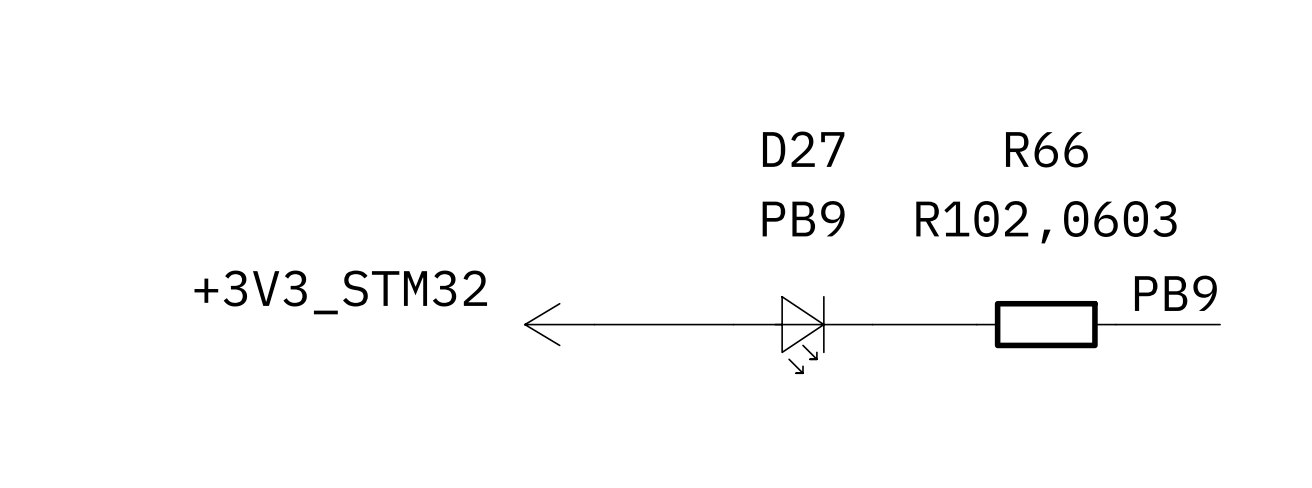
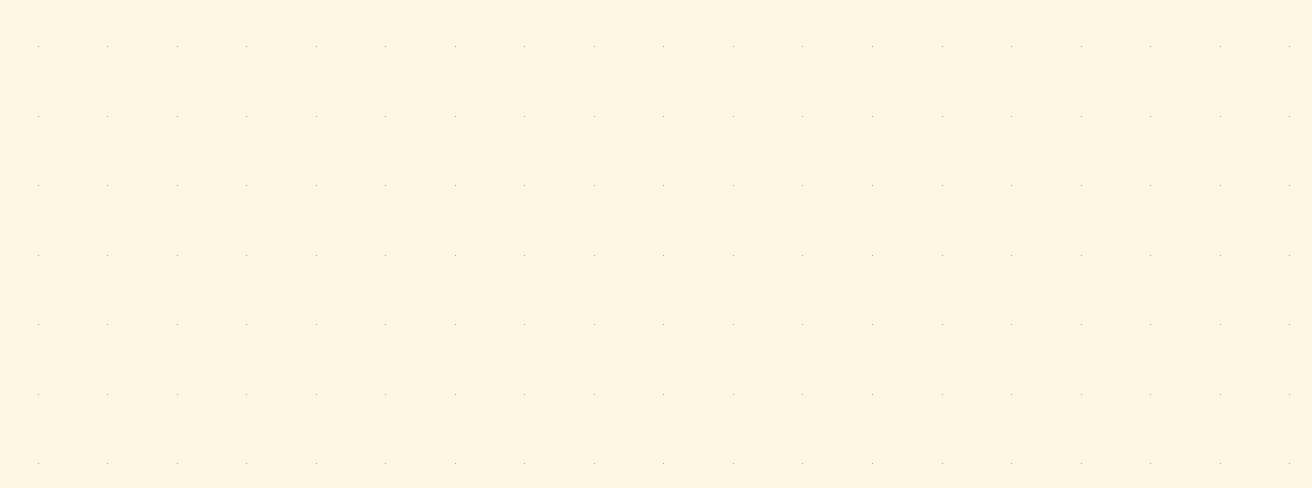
label: PB9 (1175, 293) -> none
power symbol: +3V3_STM32 (559, 324) -> none
wire: (594, 324) (733, 324) -> none
wire: (872, 324) (976, 324) -> none
R66: R102,0603 (1046, 324) -> none
wire: (1115, 324) (1220, 324) -> none
D27: PB9 (802, 335) -> none

